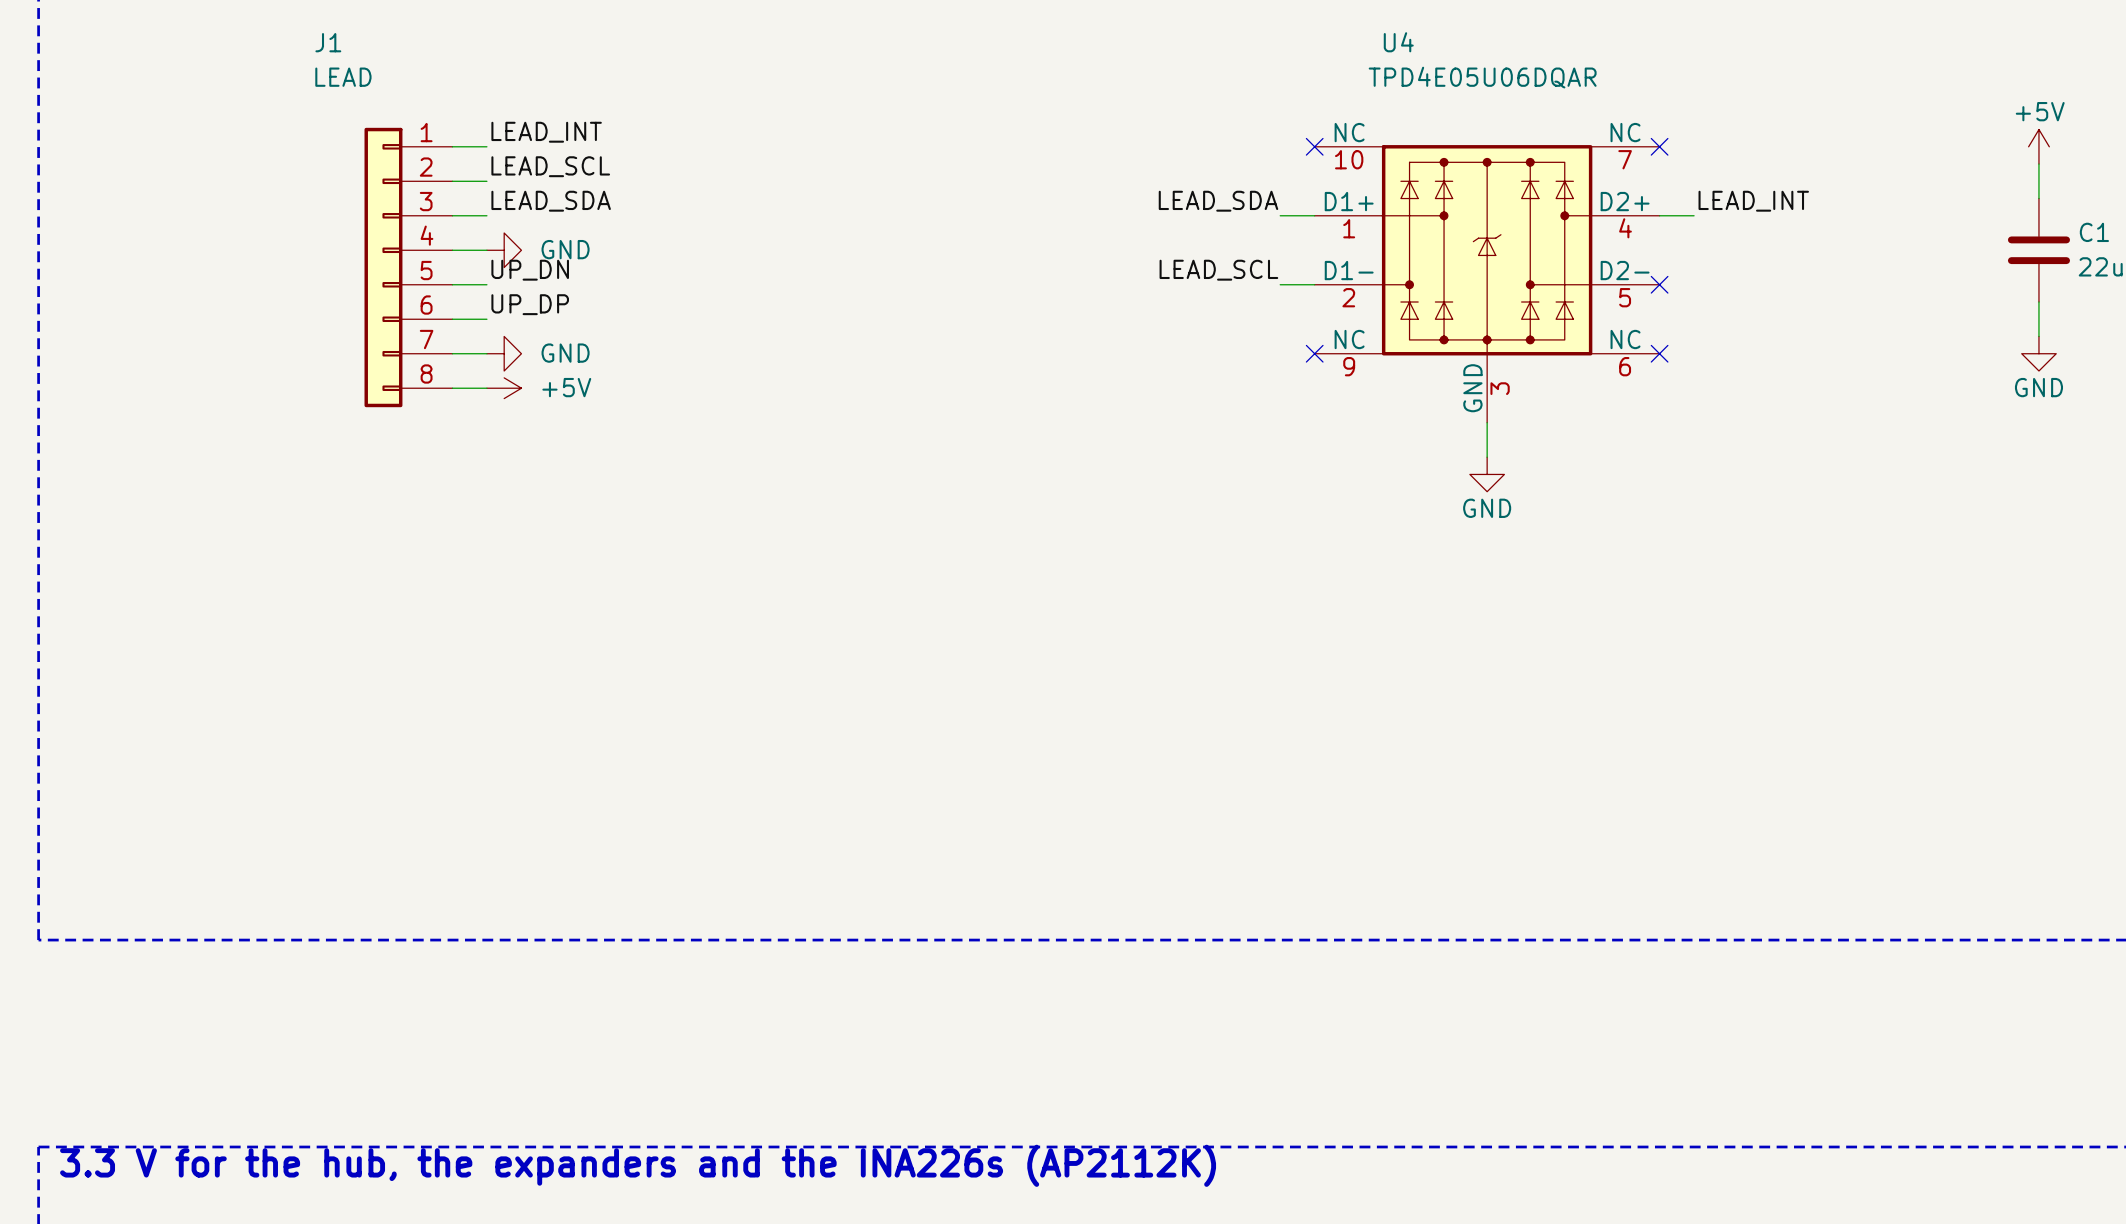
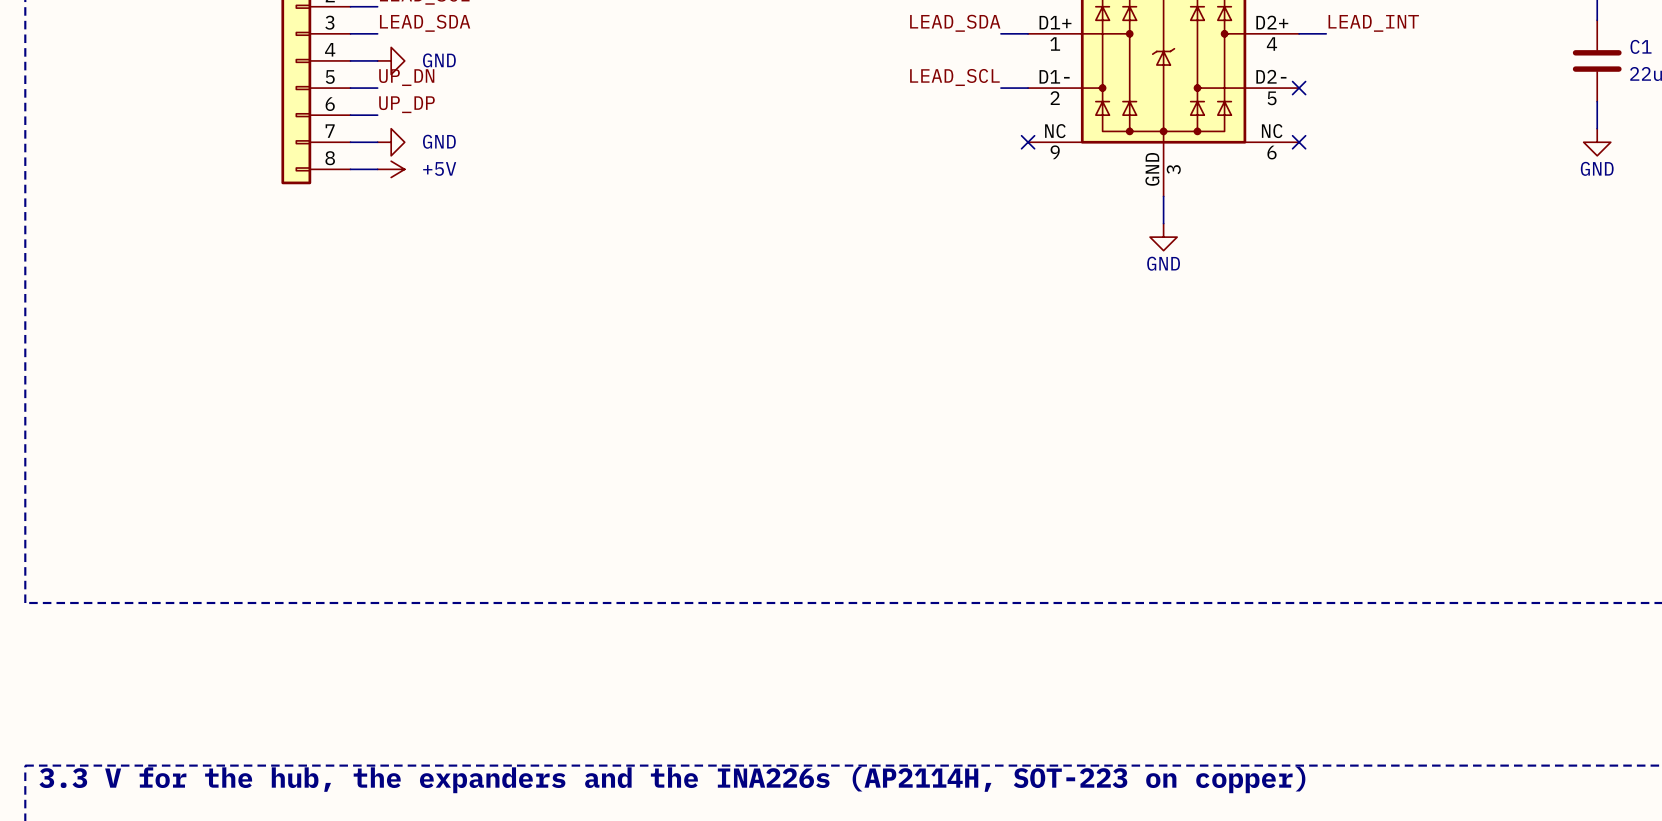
text: 3.3 V for the hub, the expanders and the INA226s (AP2112K) (638, 1165) -> 3.3 V for the hub, the expanders and the INA226s (AP2114H, SOT-223 on copper) (672, 779)

